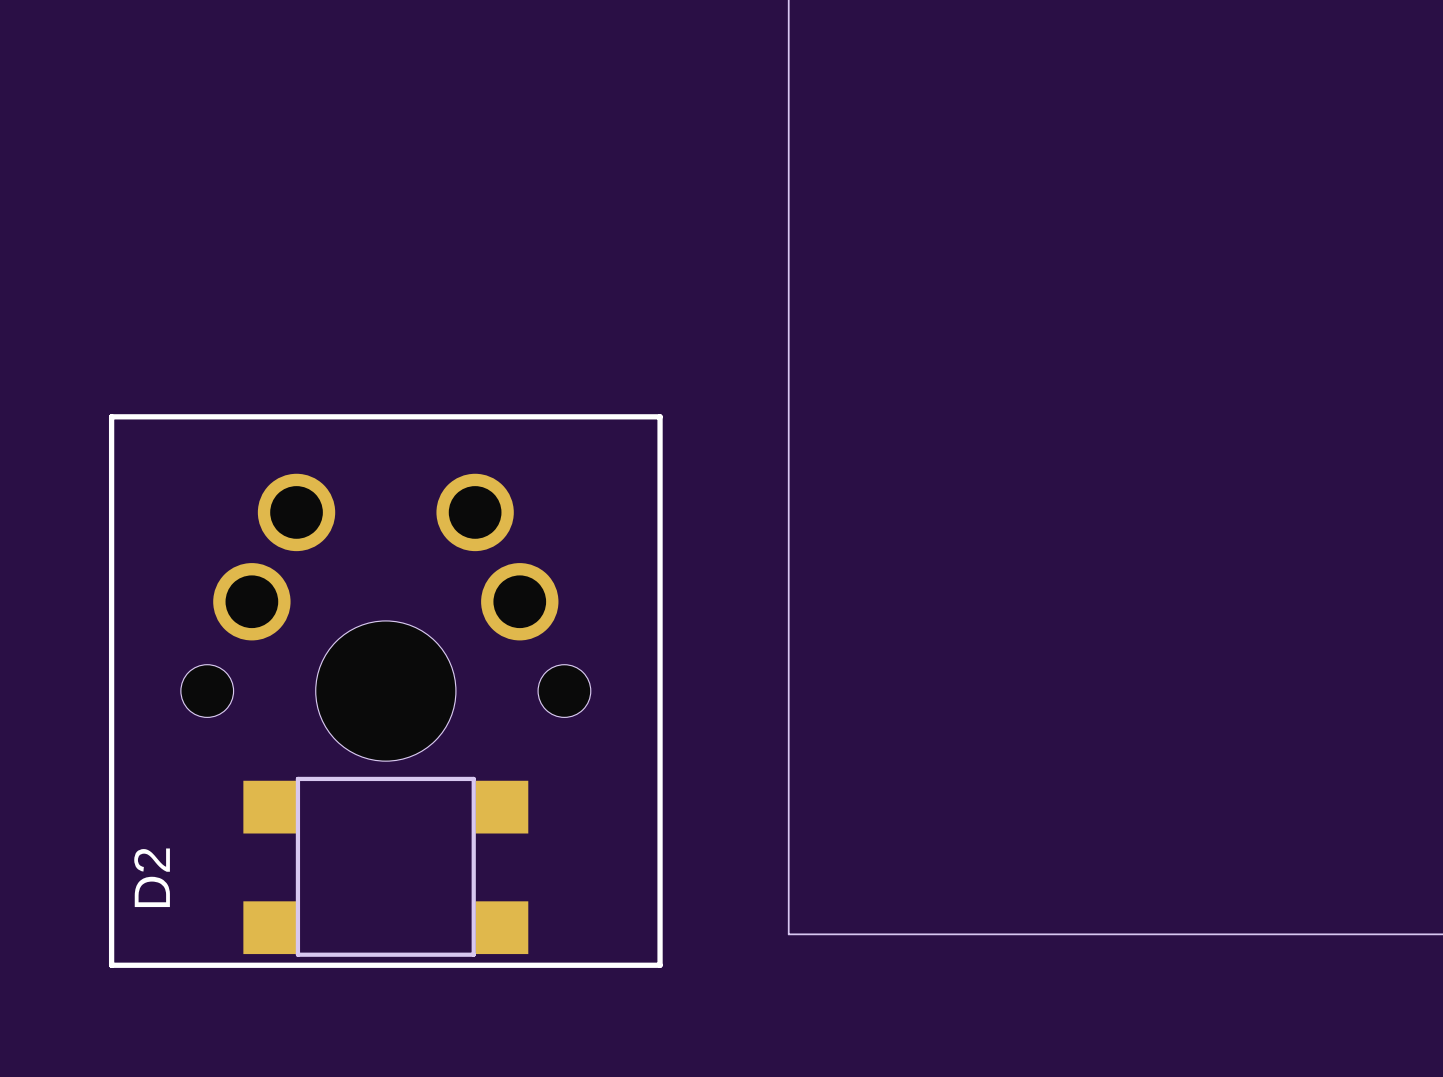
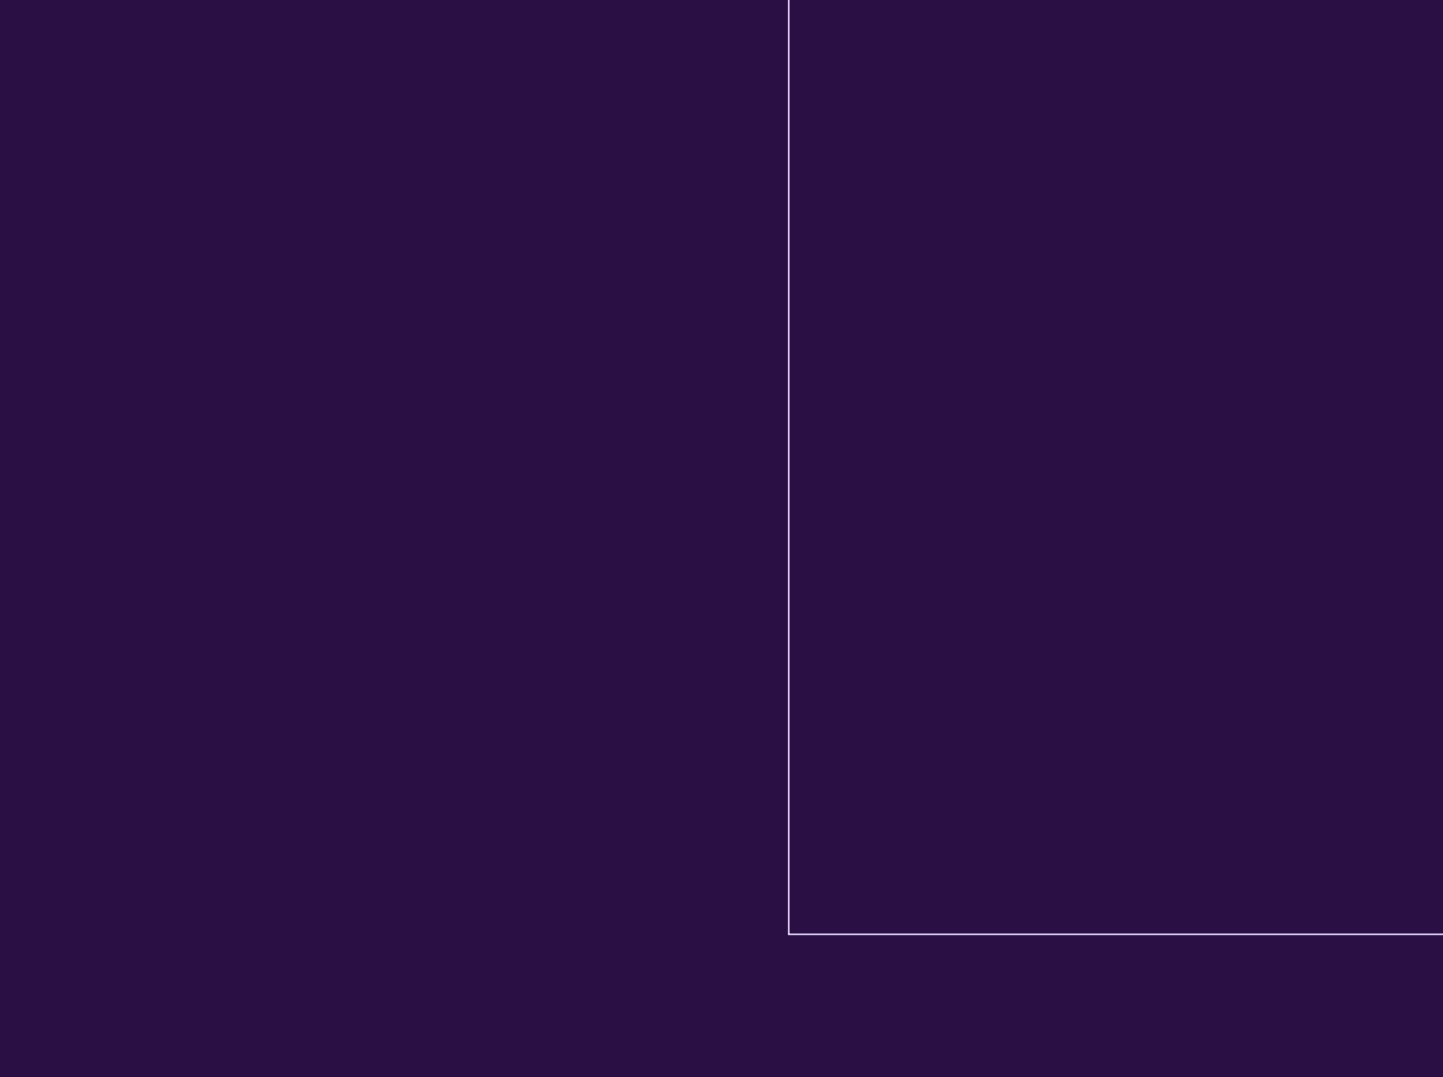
D2: (385, 691) -> none

